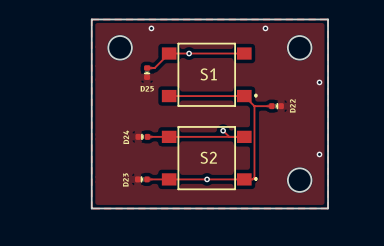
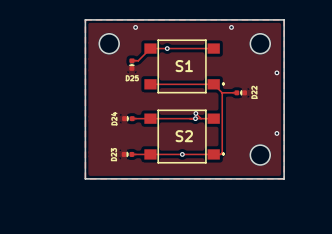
via: none -> (195, 118)

